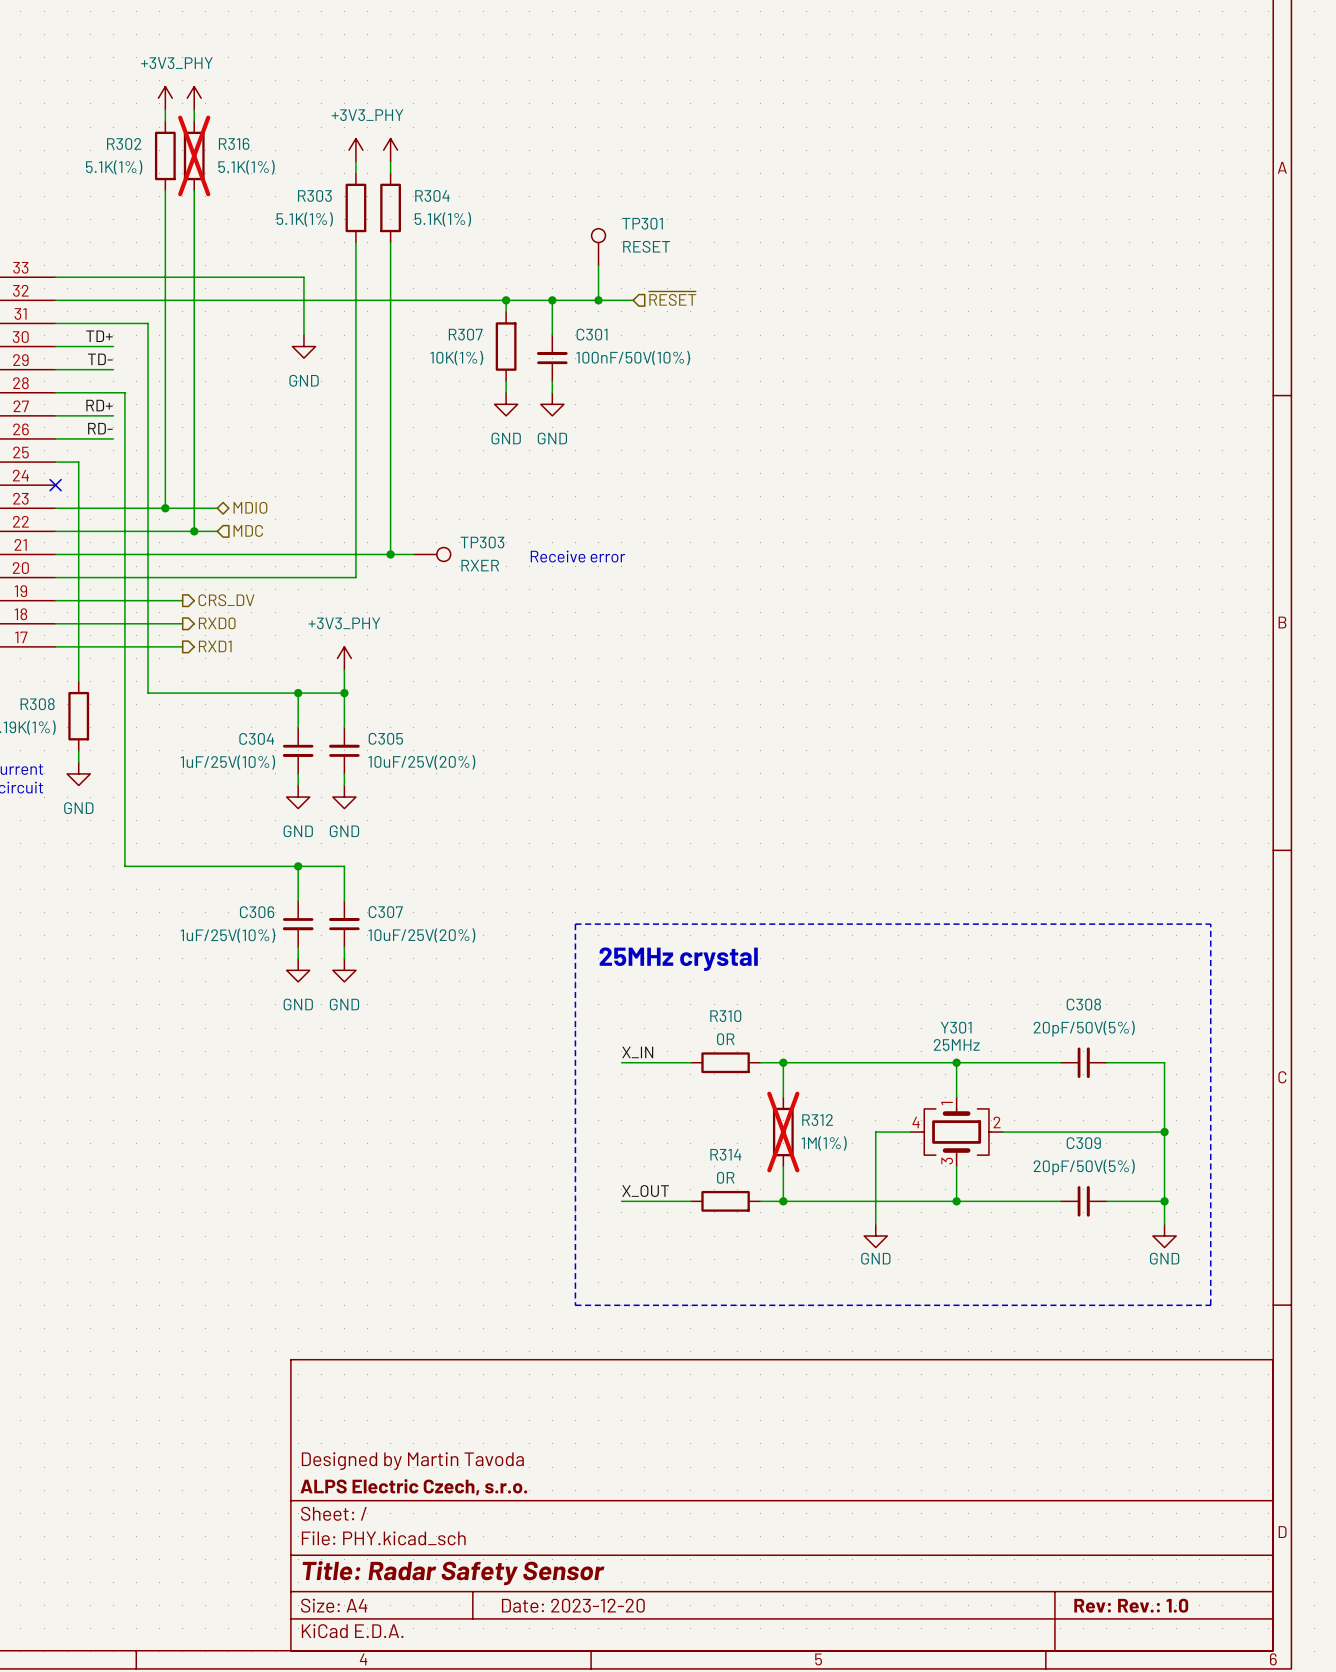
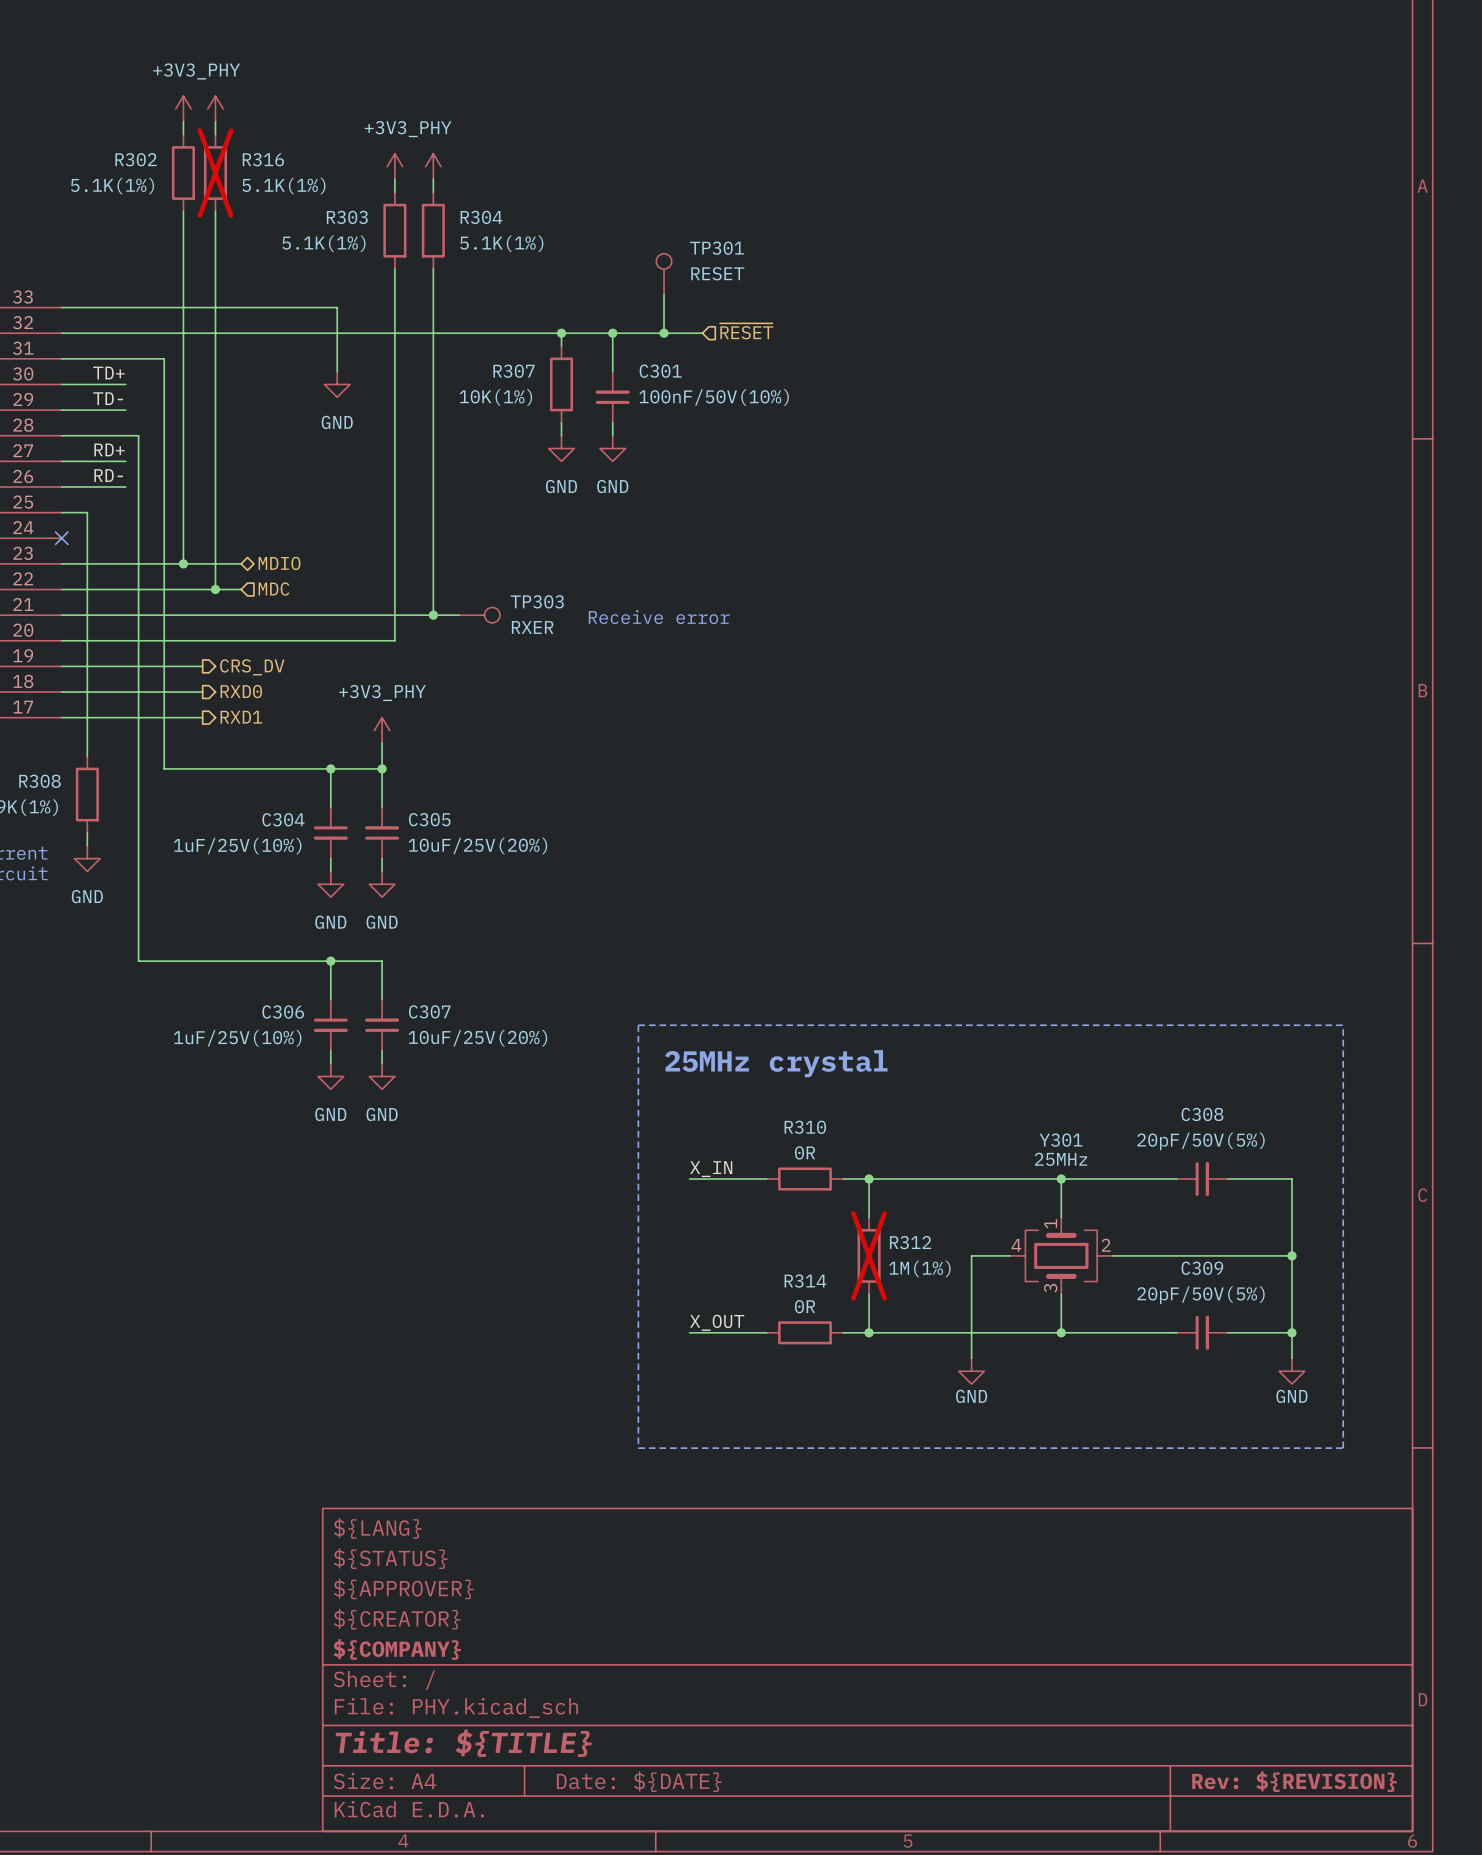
title block: none -> ${LANG} (377, 1528)
title block: none -> ${STATUS} (390, 1558)
title block: none -> ${APPROVER} (403, 1588)
title block: Designed by Martin Tavoda (412, 1461) -> ${CREATOR} (397, 1619)
title block: ALPS Electric Czech, s.r.o. (413, 1487) -> ${COMPANY} (397, 1649)
title block: Title: Radar Safety Sensor (453, 1573) -> Title: ${TITLE} (463, 1743)
title block: Date: 2023-12-20 (573, 1605) -> Date: ${DATE} (639, 1781)
title block: Rev: Rev.: 1.0 (1131, 1605) -> Rev: ${REVISION} (1294, 1781)

